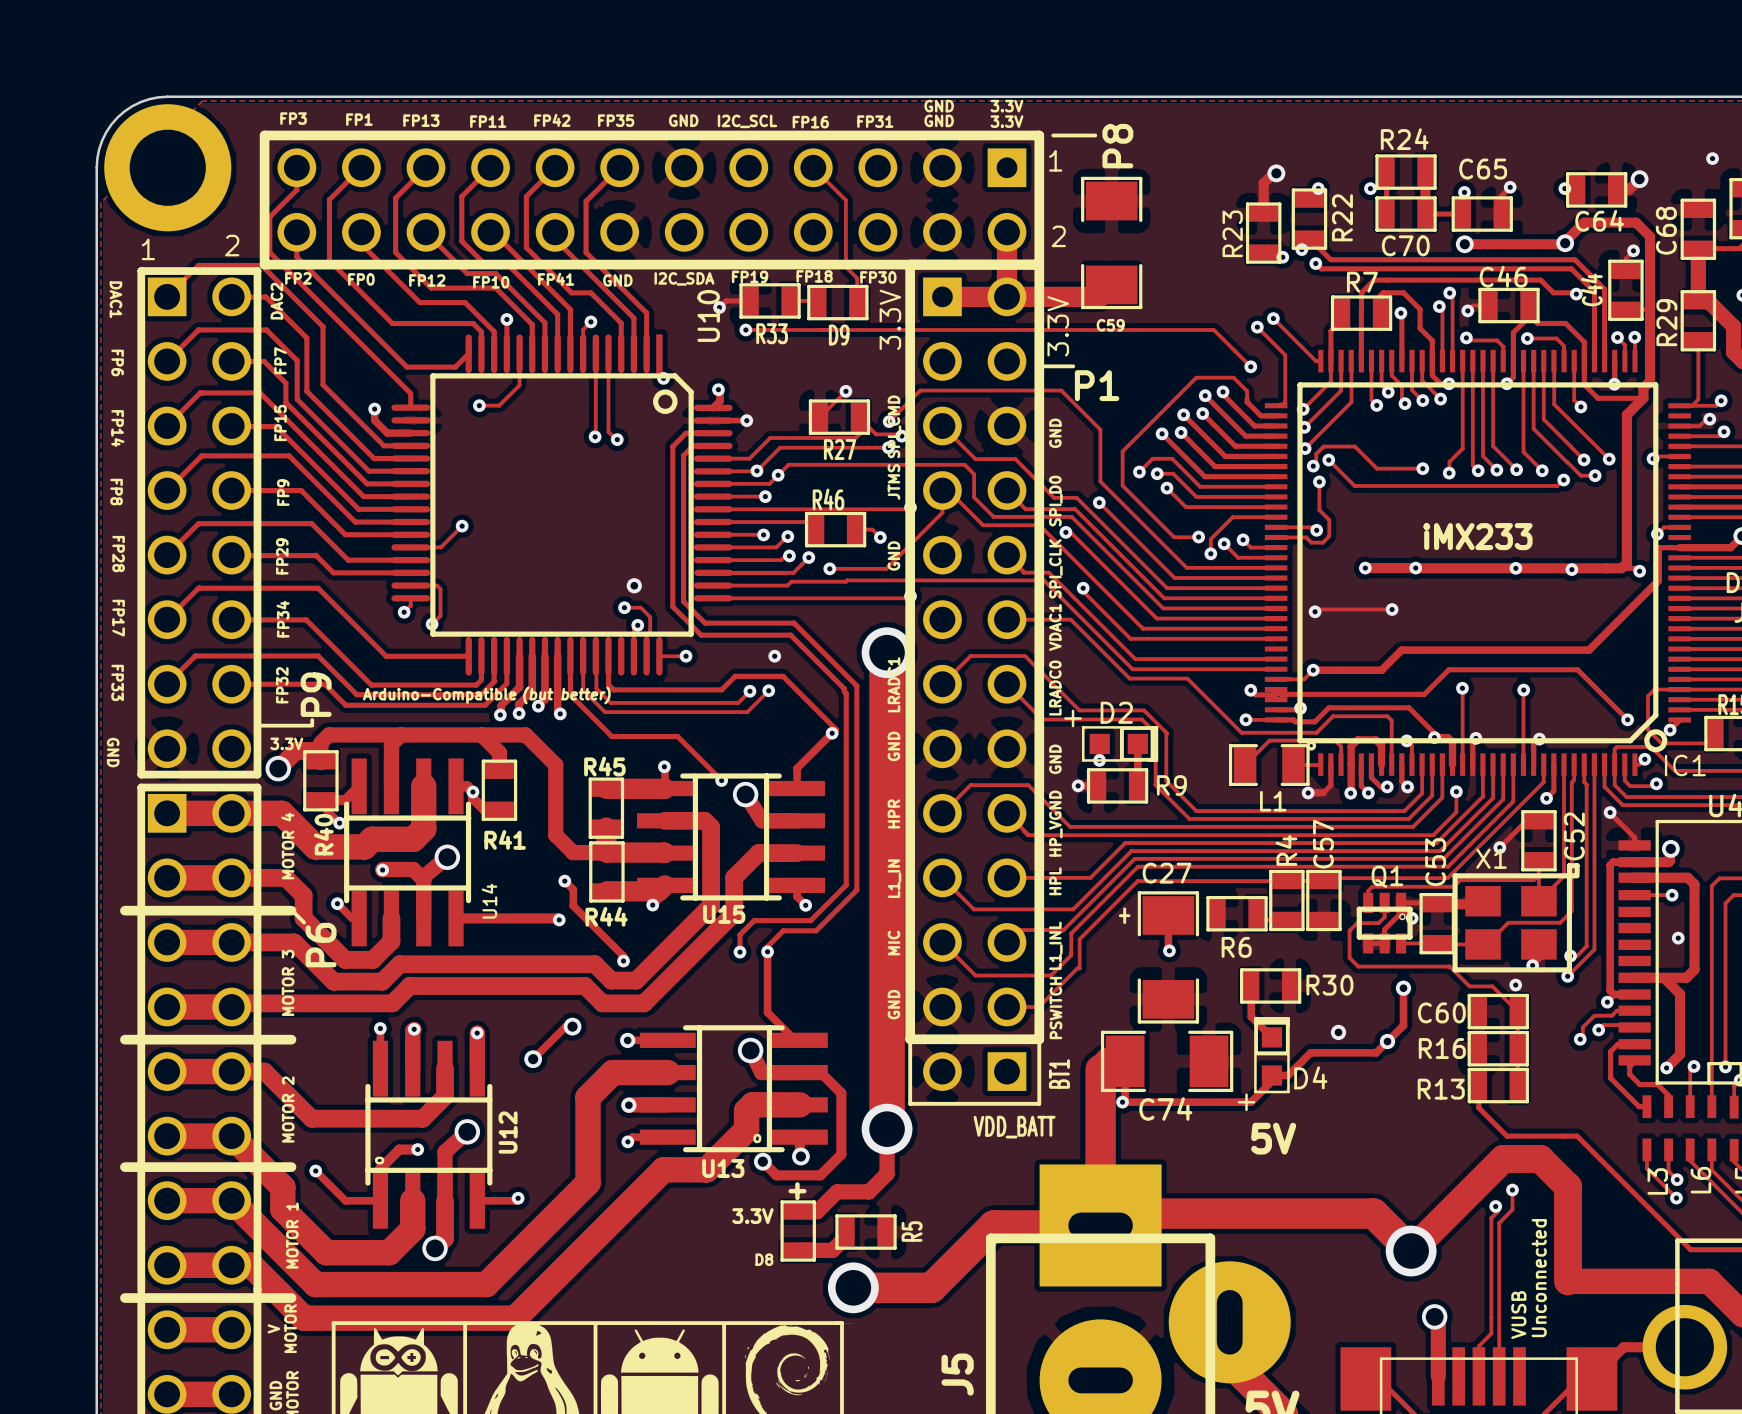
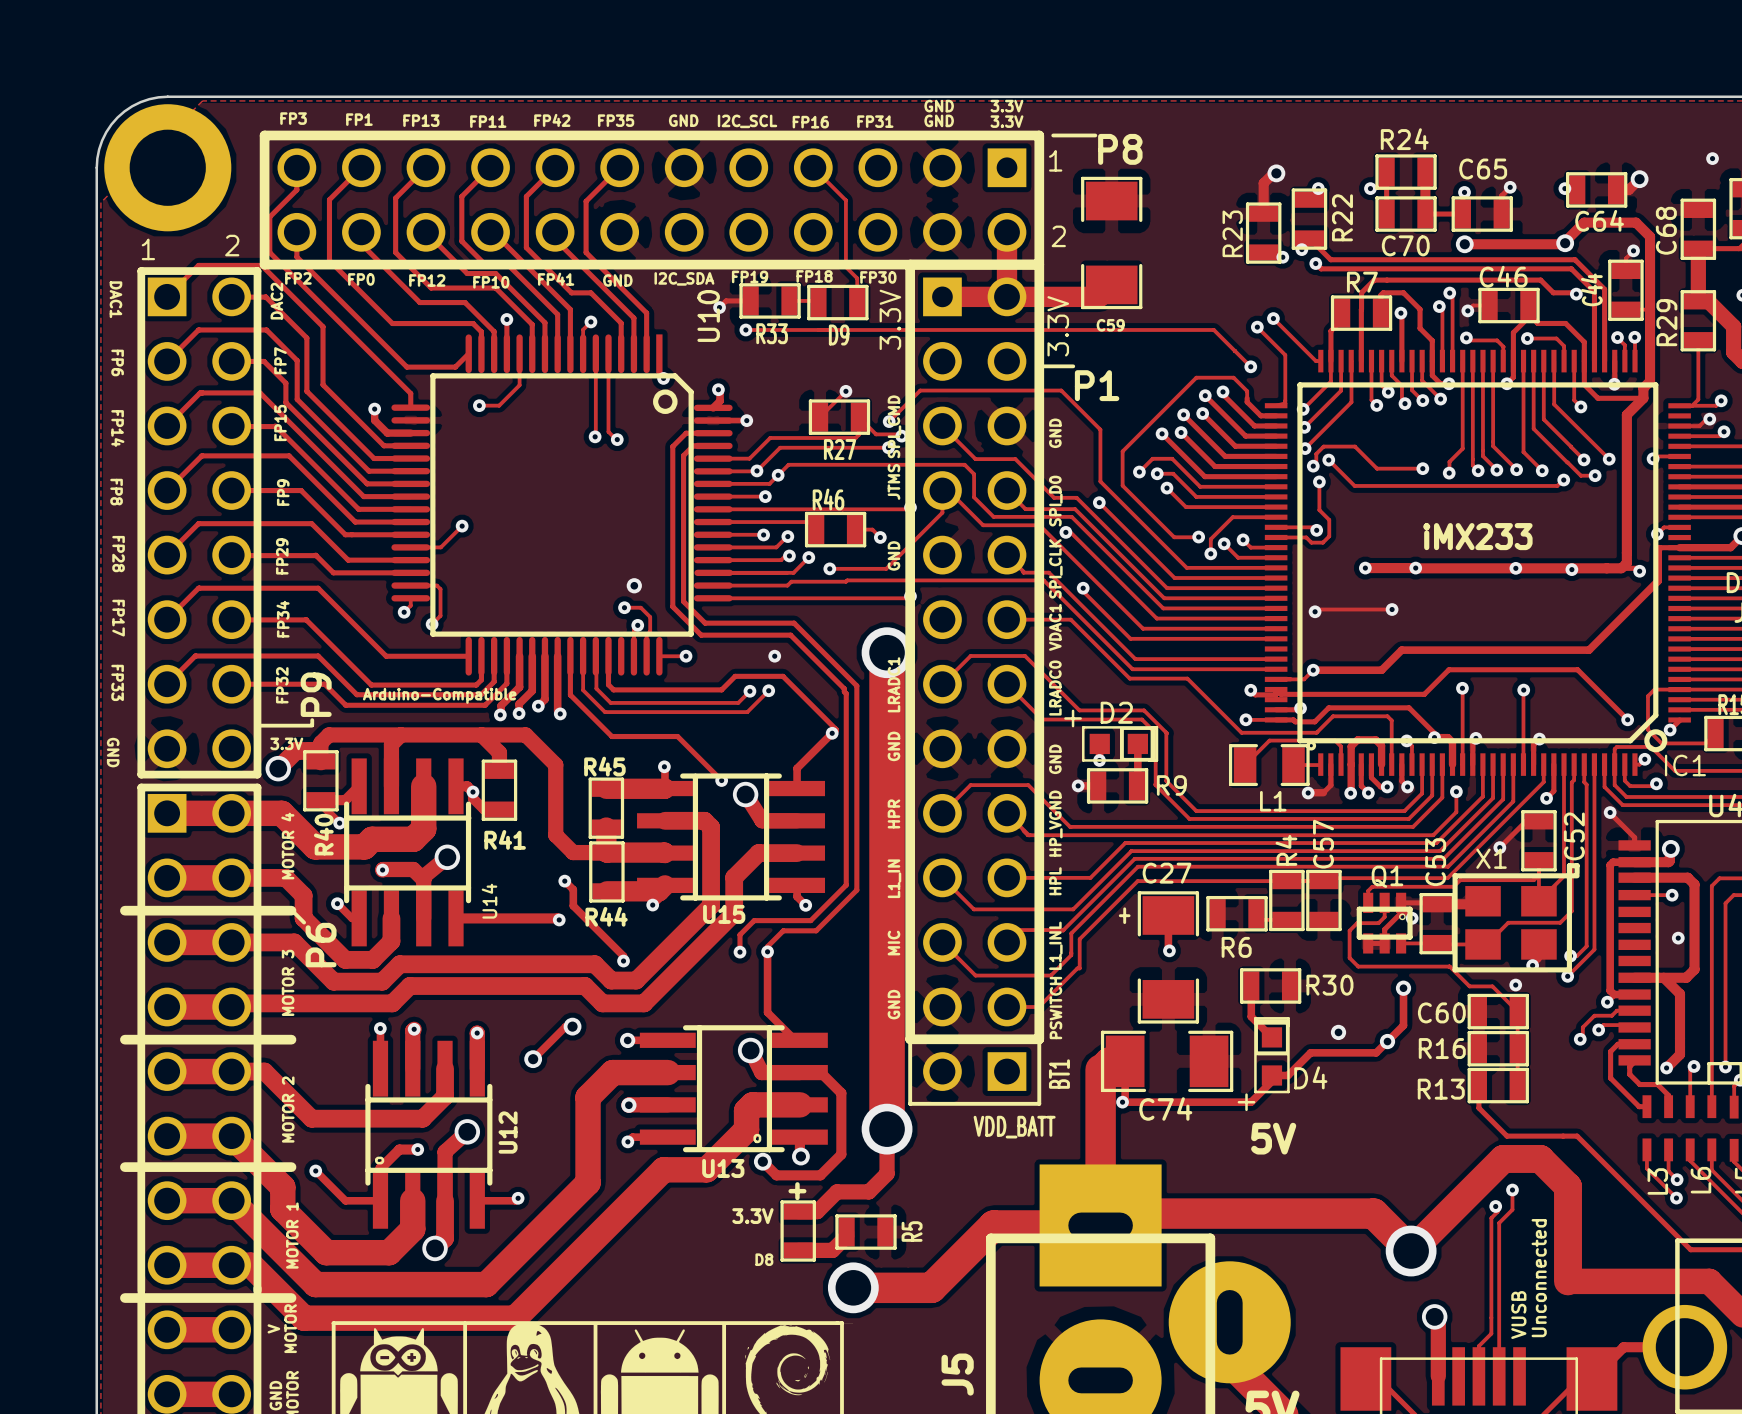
P8 name rotation: 0° (1117, 146) -> 90° clockwise (1120, 149)
text: (but better) (566, 695) -> none

